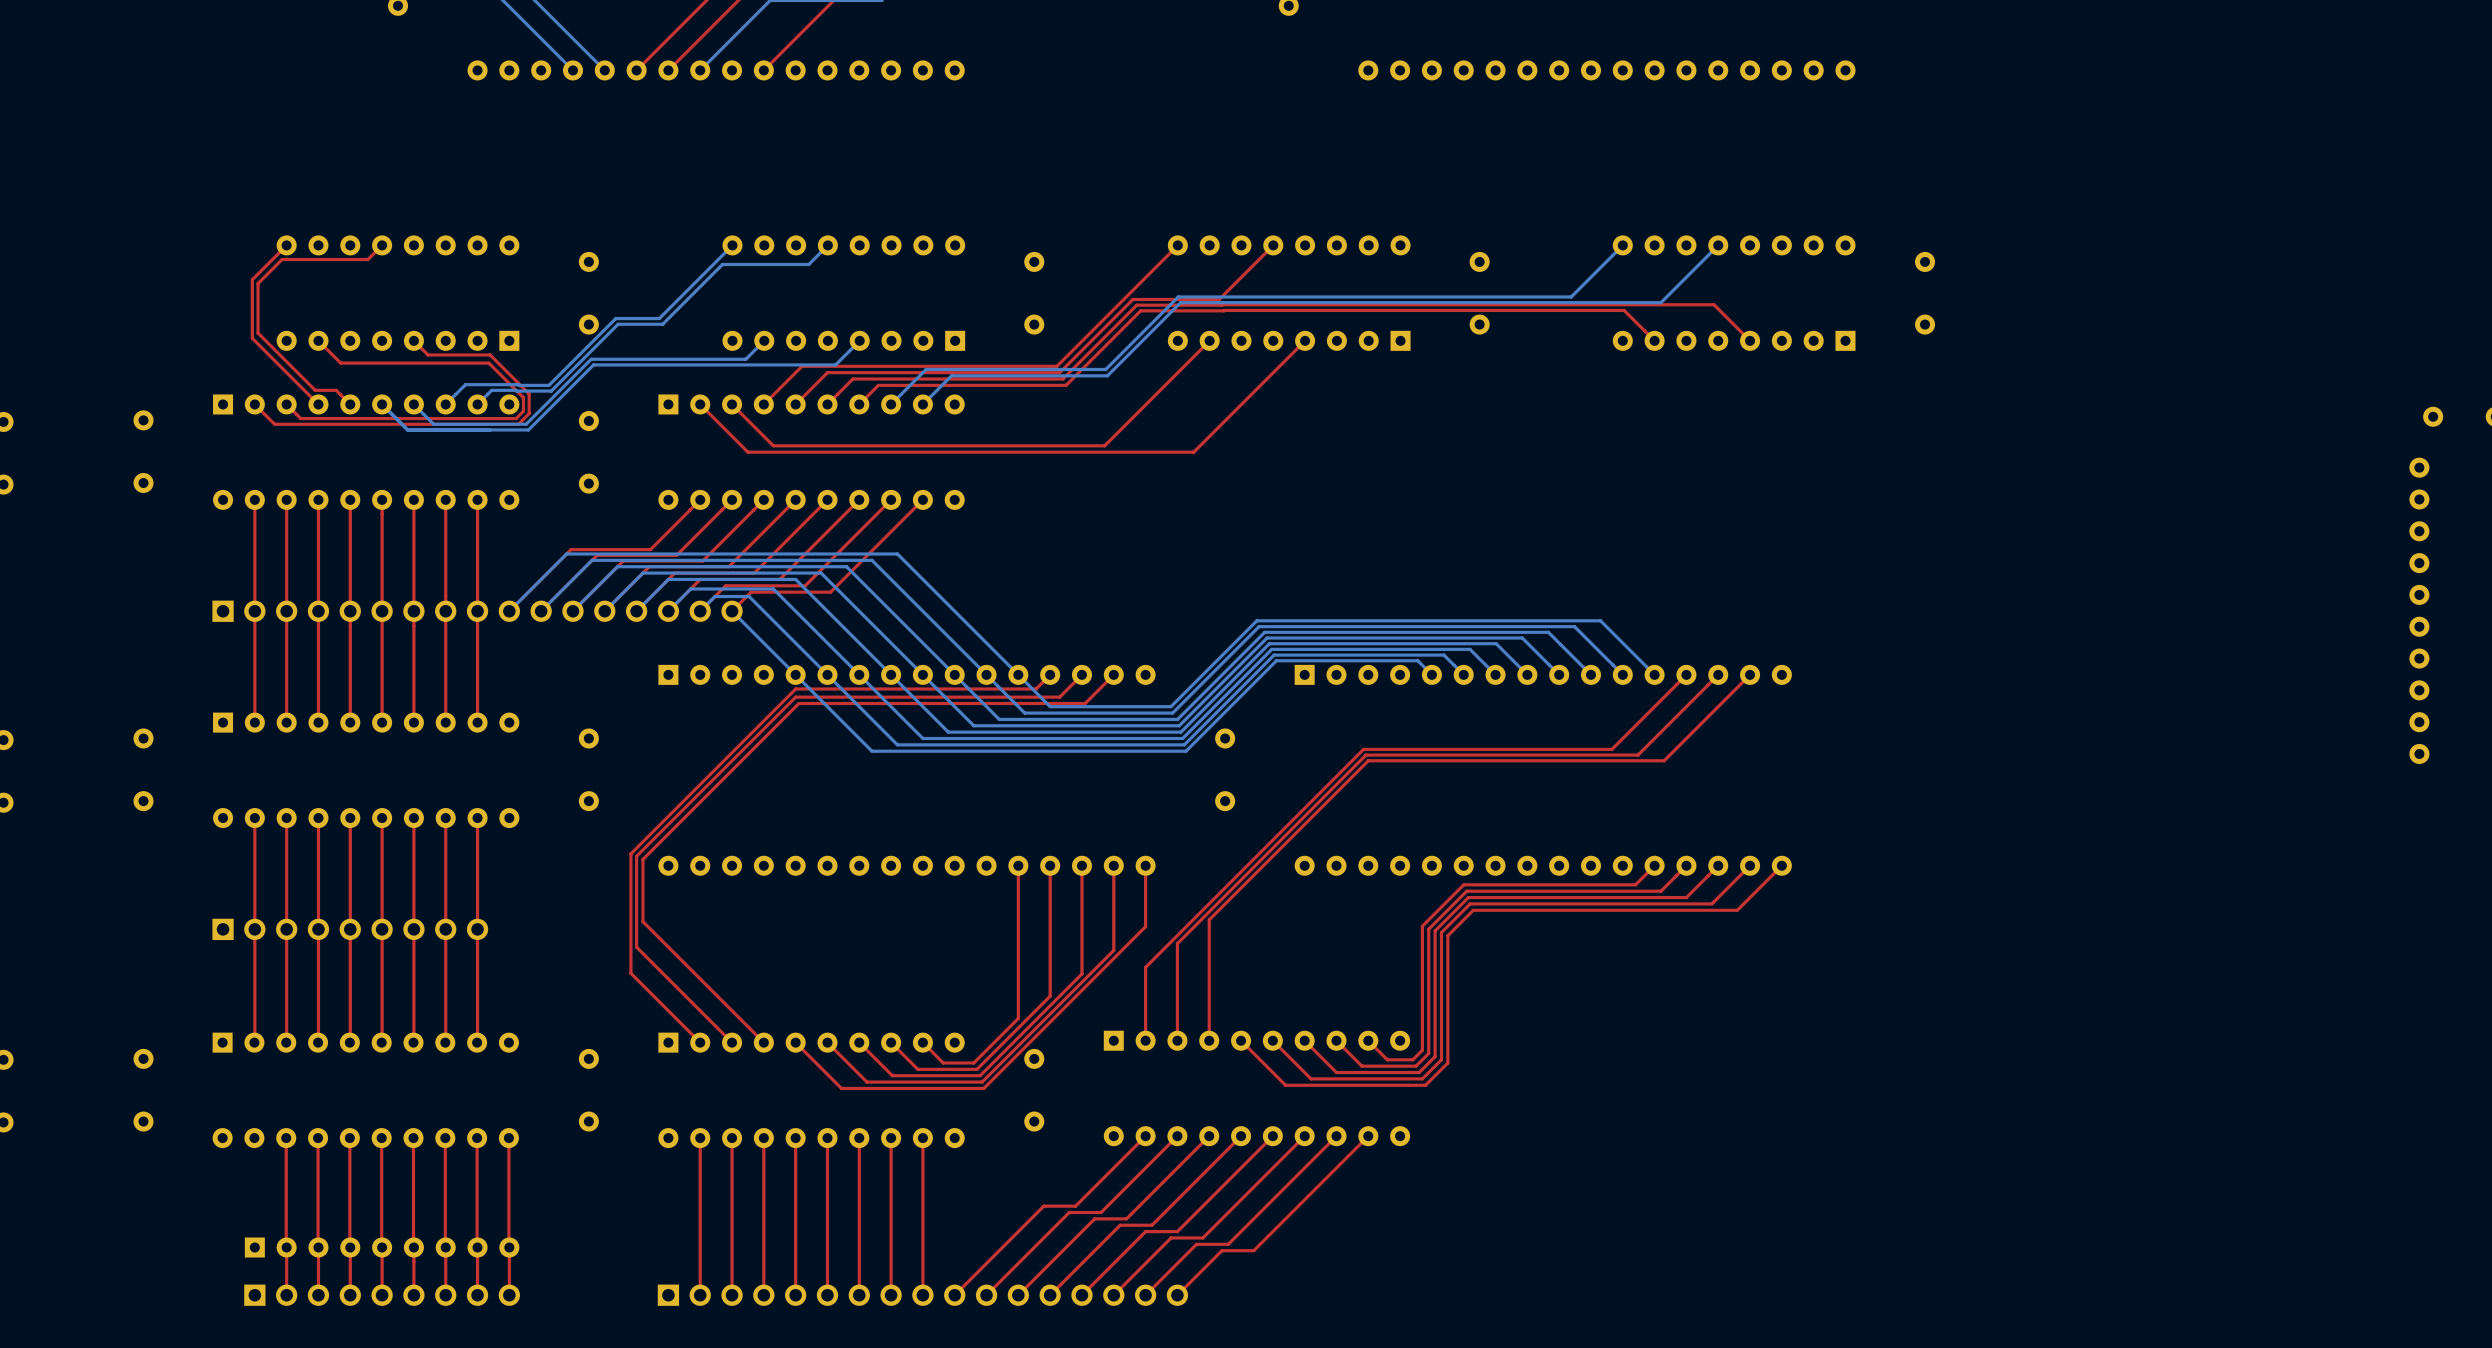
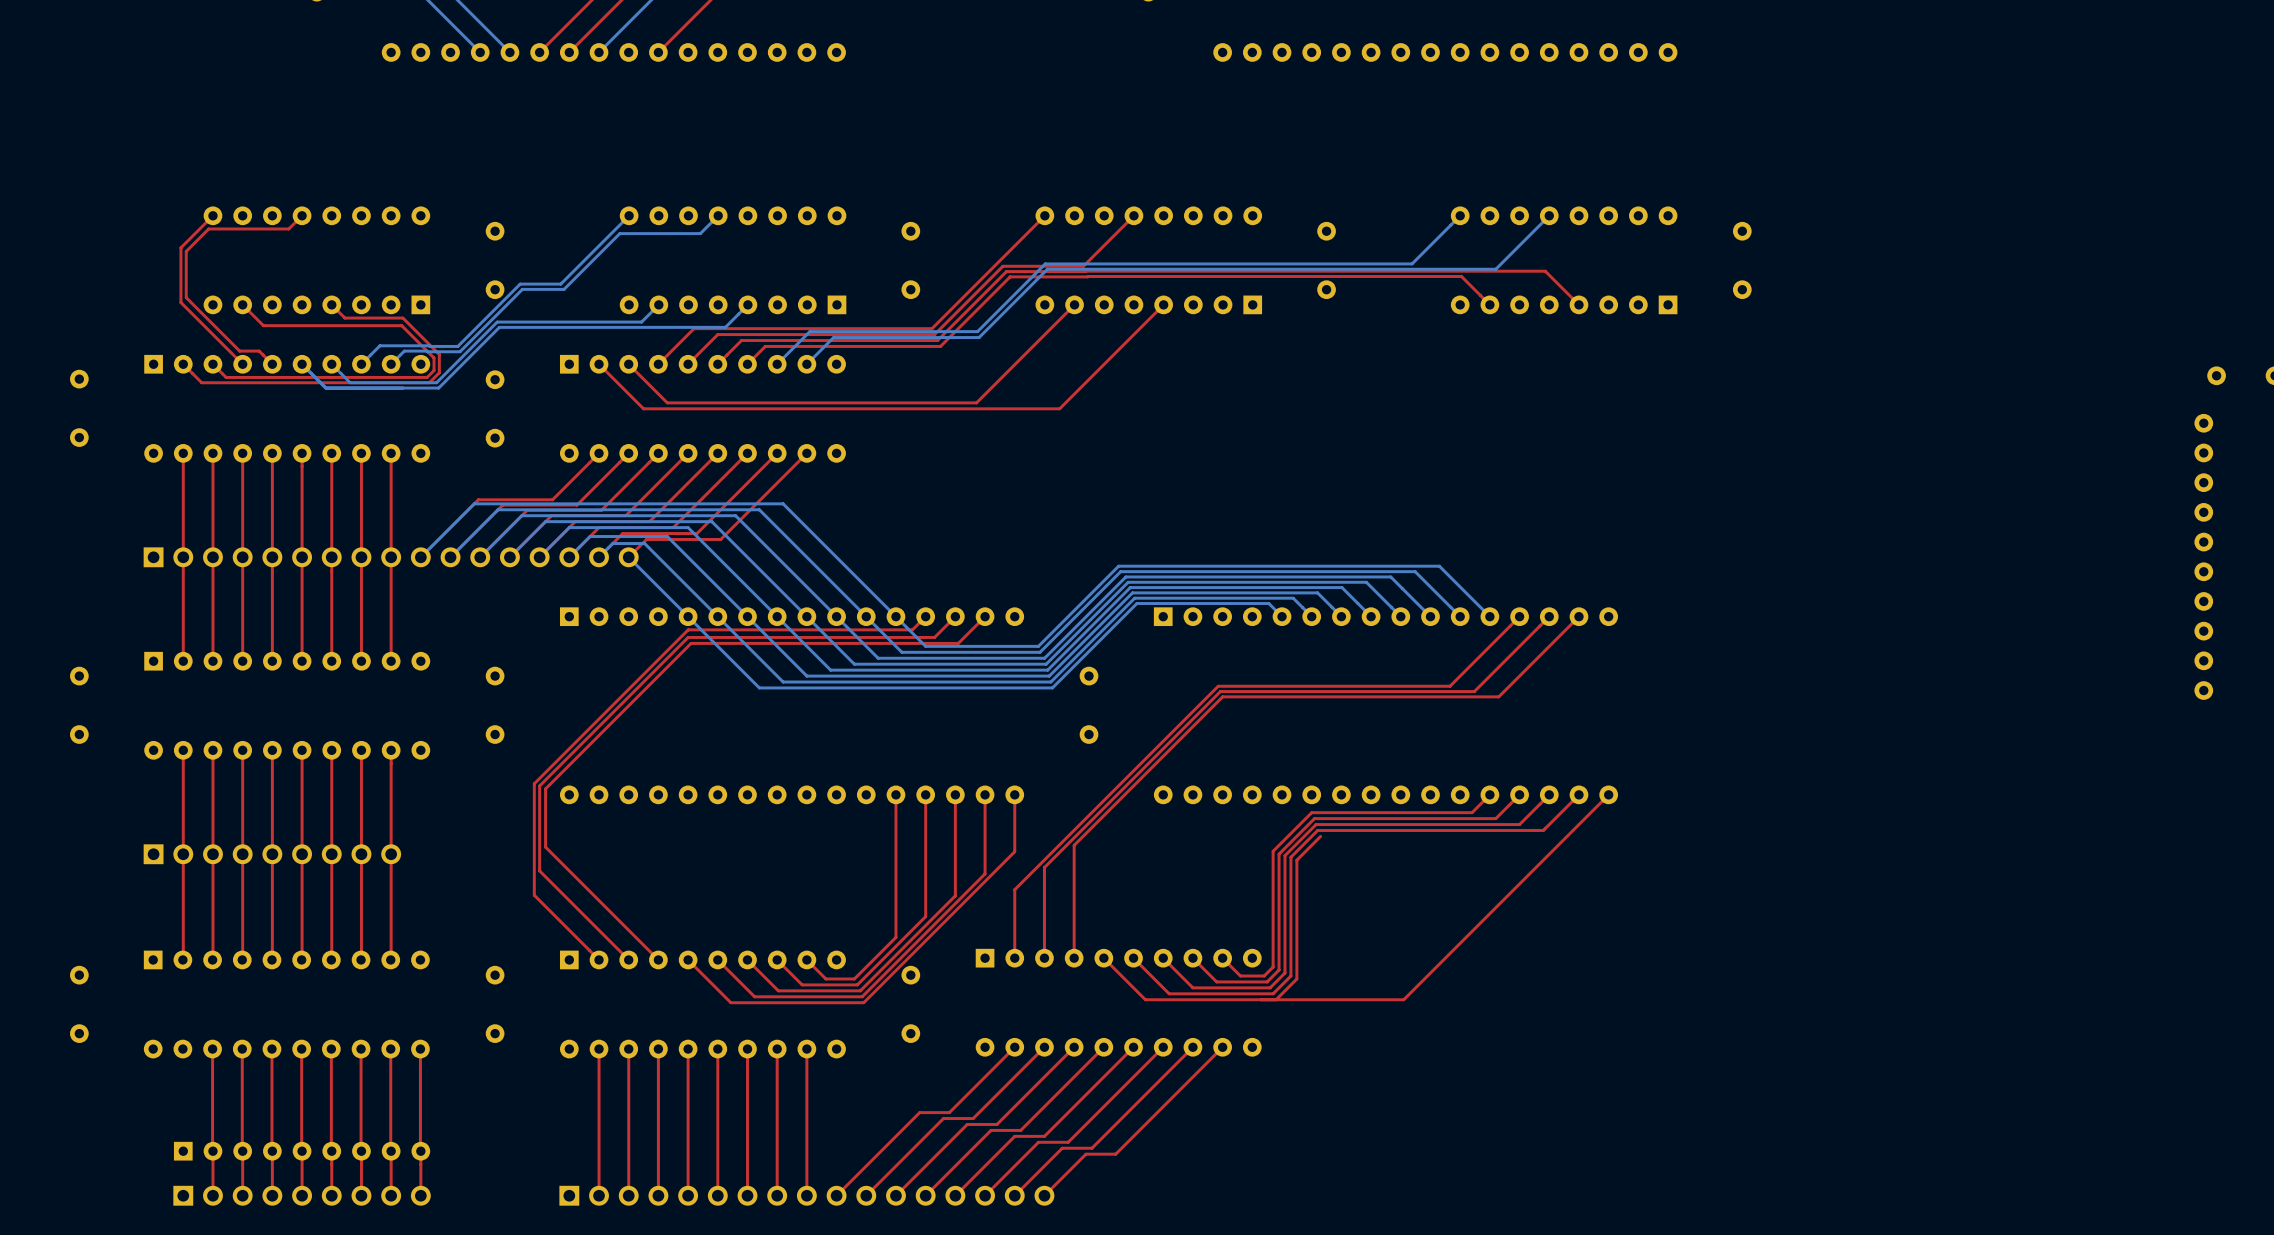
top track: (1737, 910) (1473, 910) -> (1567, 836) (1403, 999) (1276, 999)

